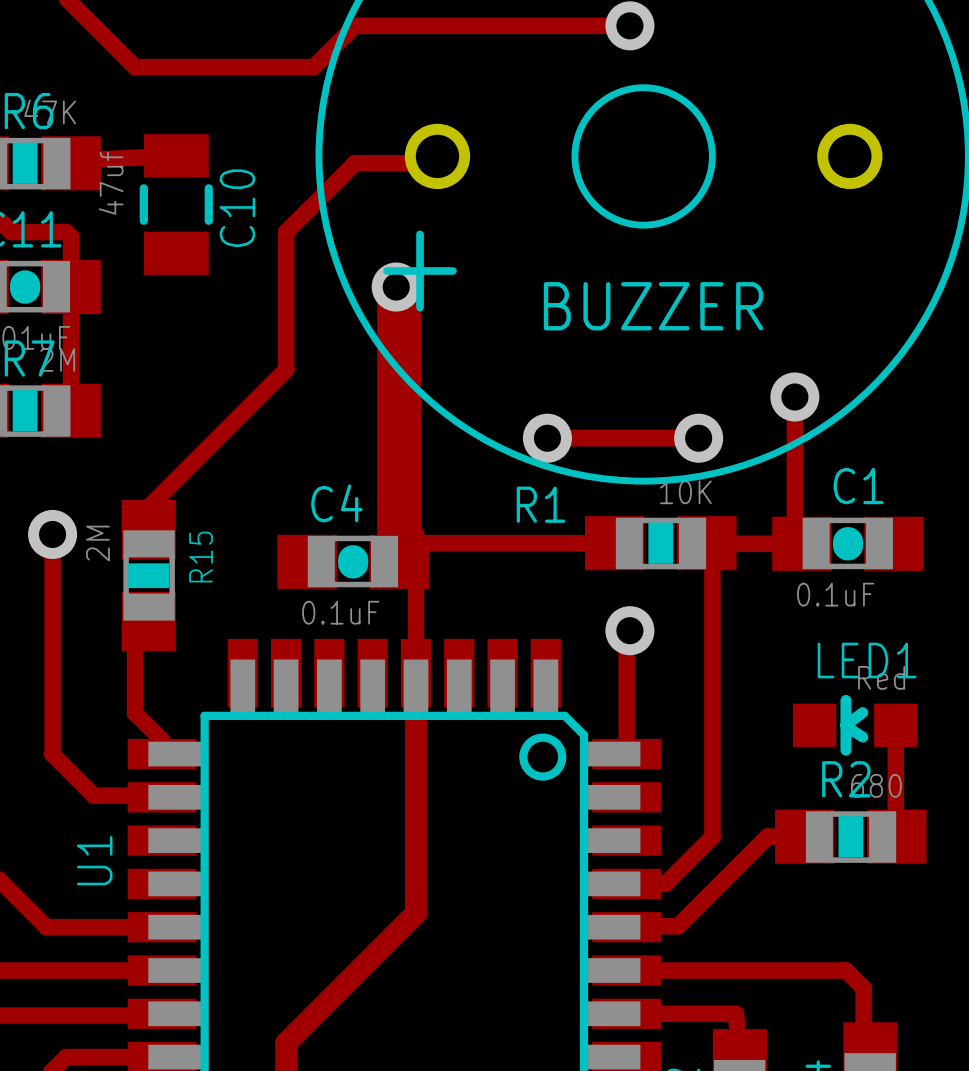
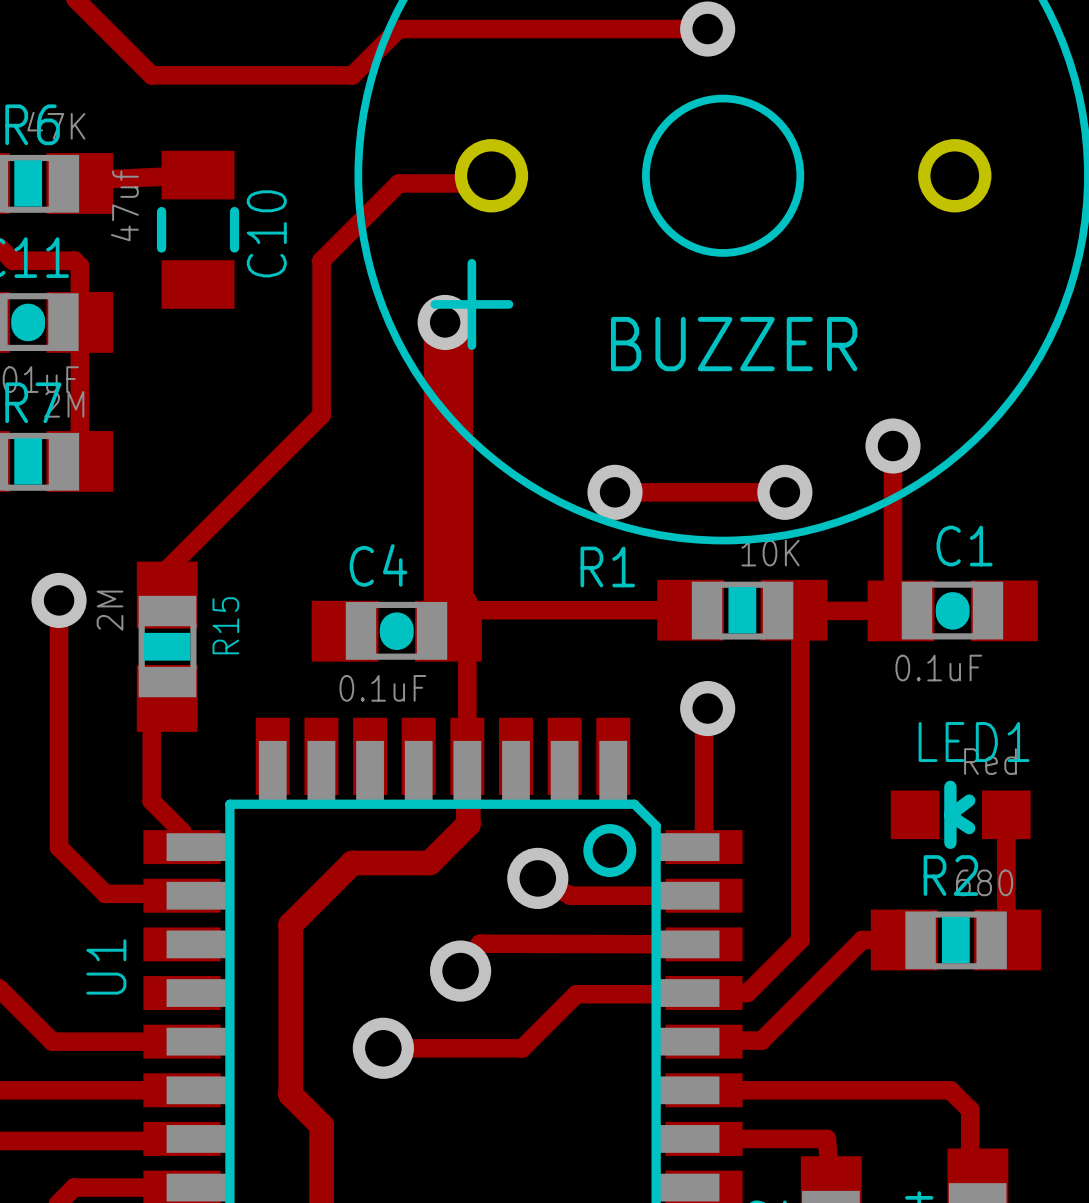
track: (415, 673) (415, 913) (286, 1043) -> (467, 756) (468, 824) (429, 862) (352, 862) (290, 924) (290, 1094) (321, 1125) (321, 1171)
track: none -> (537, 878) (570, 895) (704, 895)
via: none -> (537, 878)
track: none -> (704, 944) (480, 943) (460, 971)
via: none -> (460, 971)
track: none -> (704, 993) (576, 994) (522, 1048) (383, 1048)
via: none -> (383, 1048)

